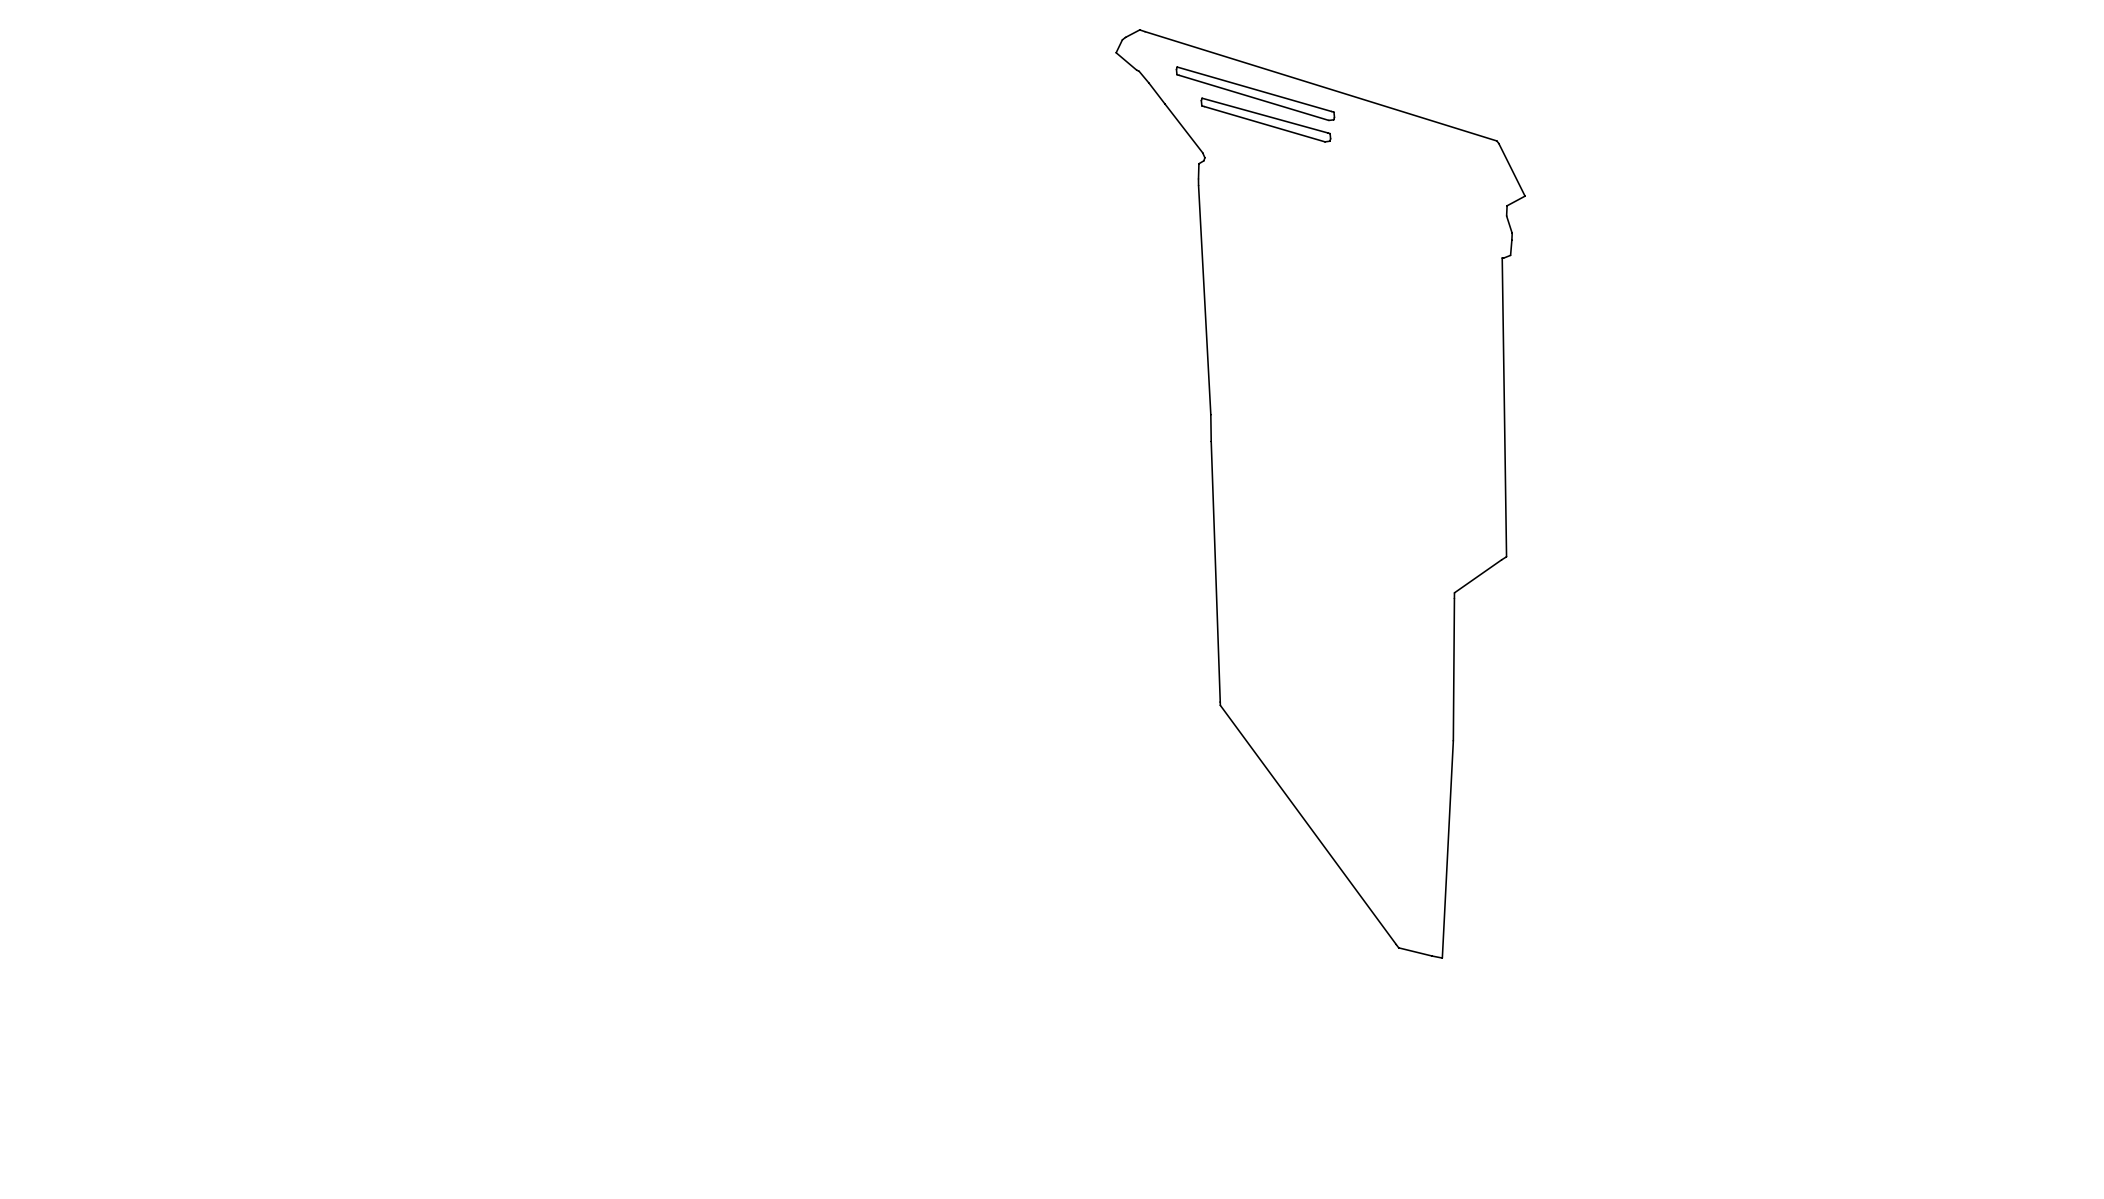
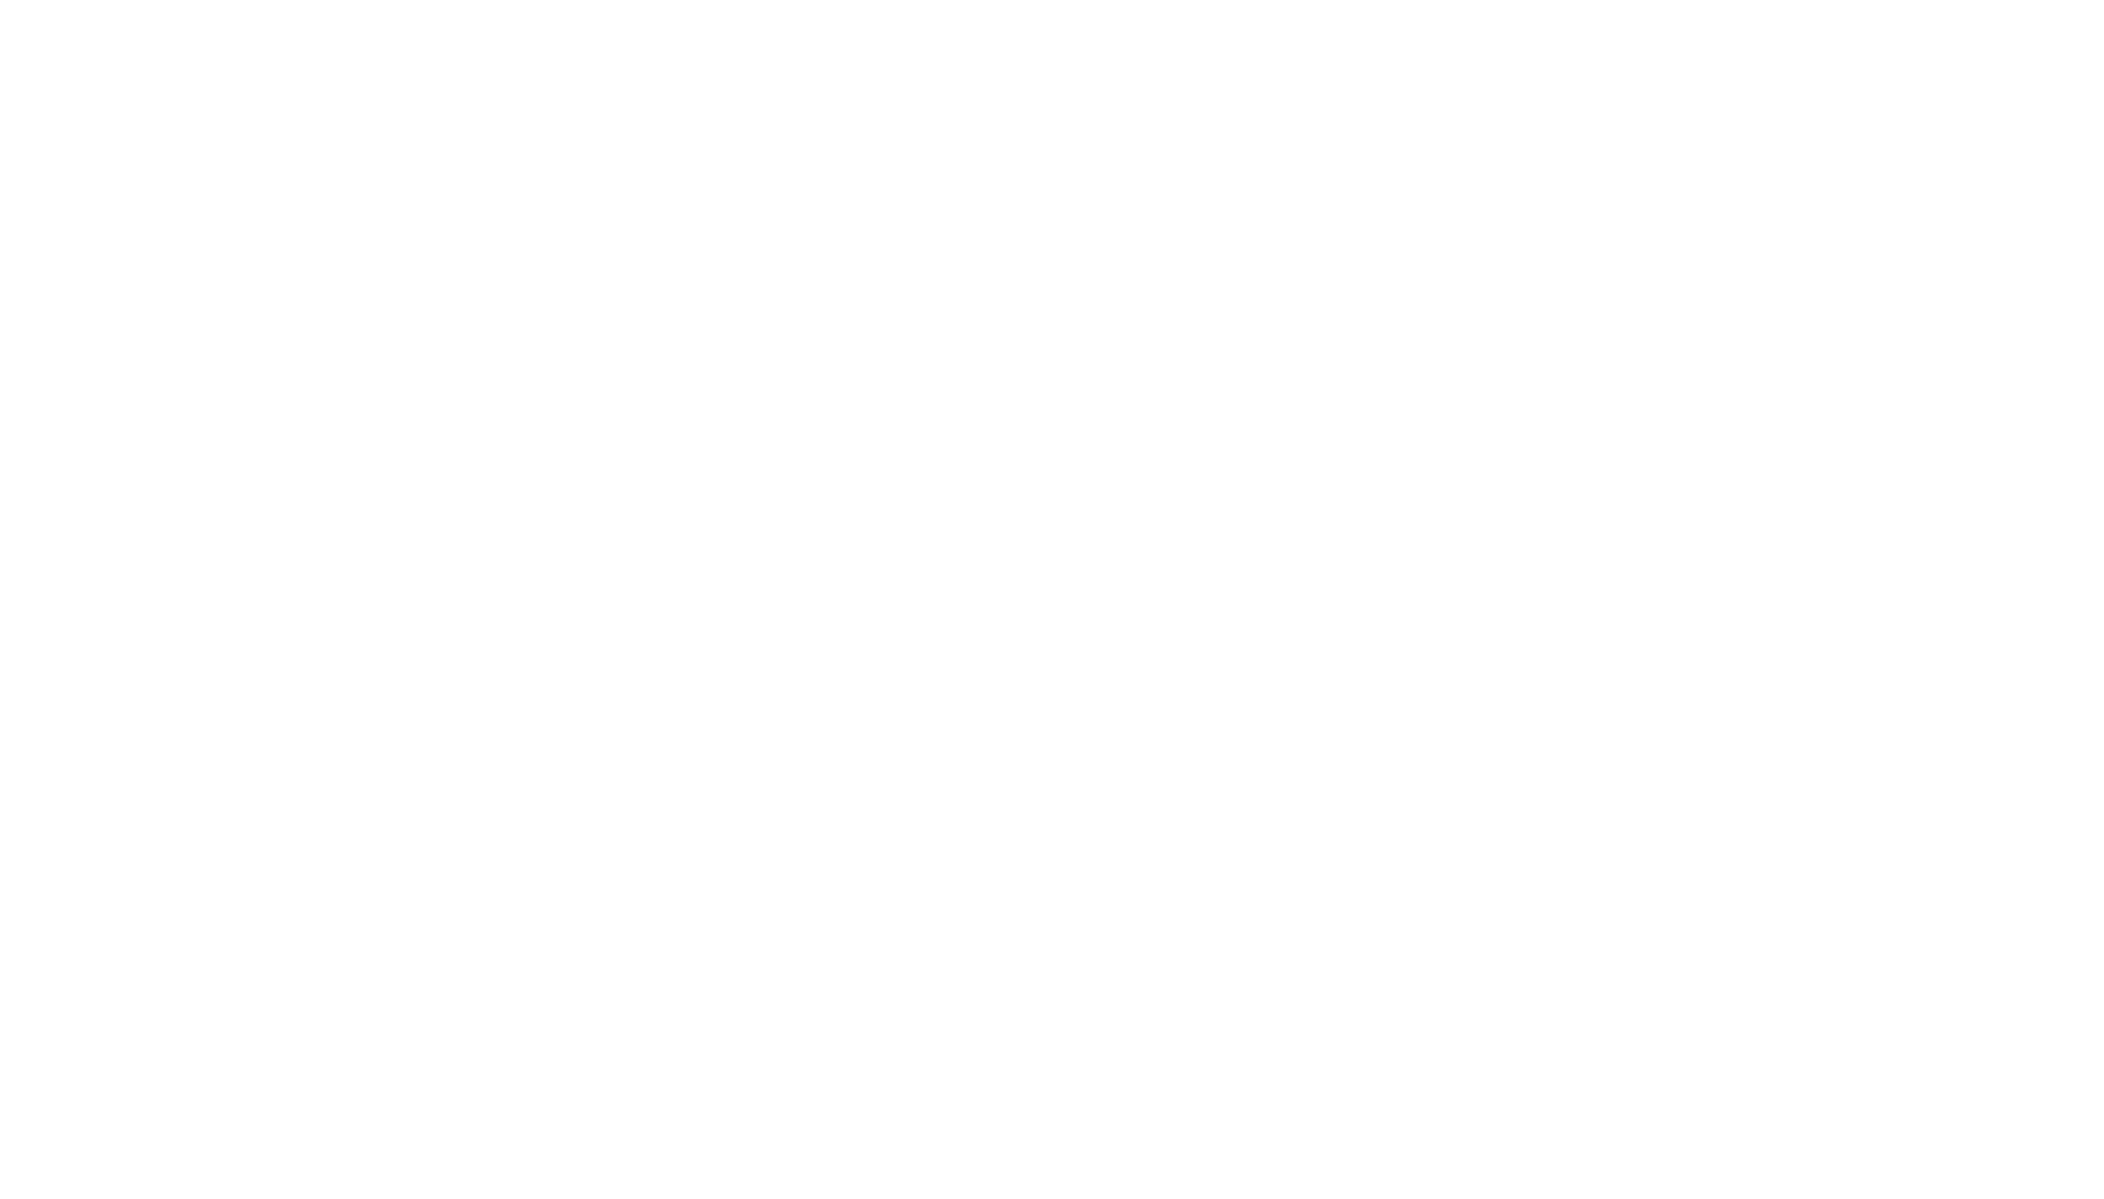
board edge: (1139, 29) (1122, 39) (1116, 52) (1139, 71) (1204, 157) (1198, 163) (1198, 185) (1210, 414) (1220, 705) (1398, 947) (1442, 958) (1453, 740) (1454, 592) (1506, 556) (1502, 257) (1510, 255) (1512, 233) (1506, 215) (1507, 205) (1525, 196) (1496, 140) (1139, 29) -> none
board edge: (1177, 67) (1333, 112) (1333, 119) (1328, 120) (1176, 74) (1177, 67) -> none
board edge: (1202, 98) (1201, 105) (1325, 141) (1329, 141) (1330, 133) (1202, 98) -> none

